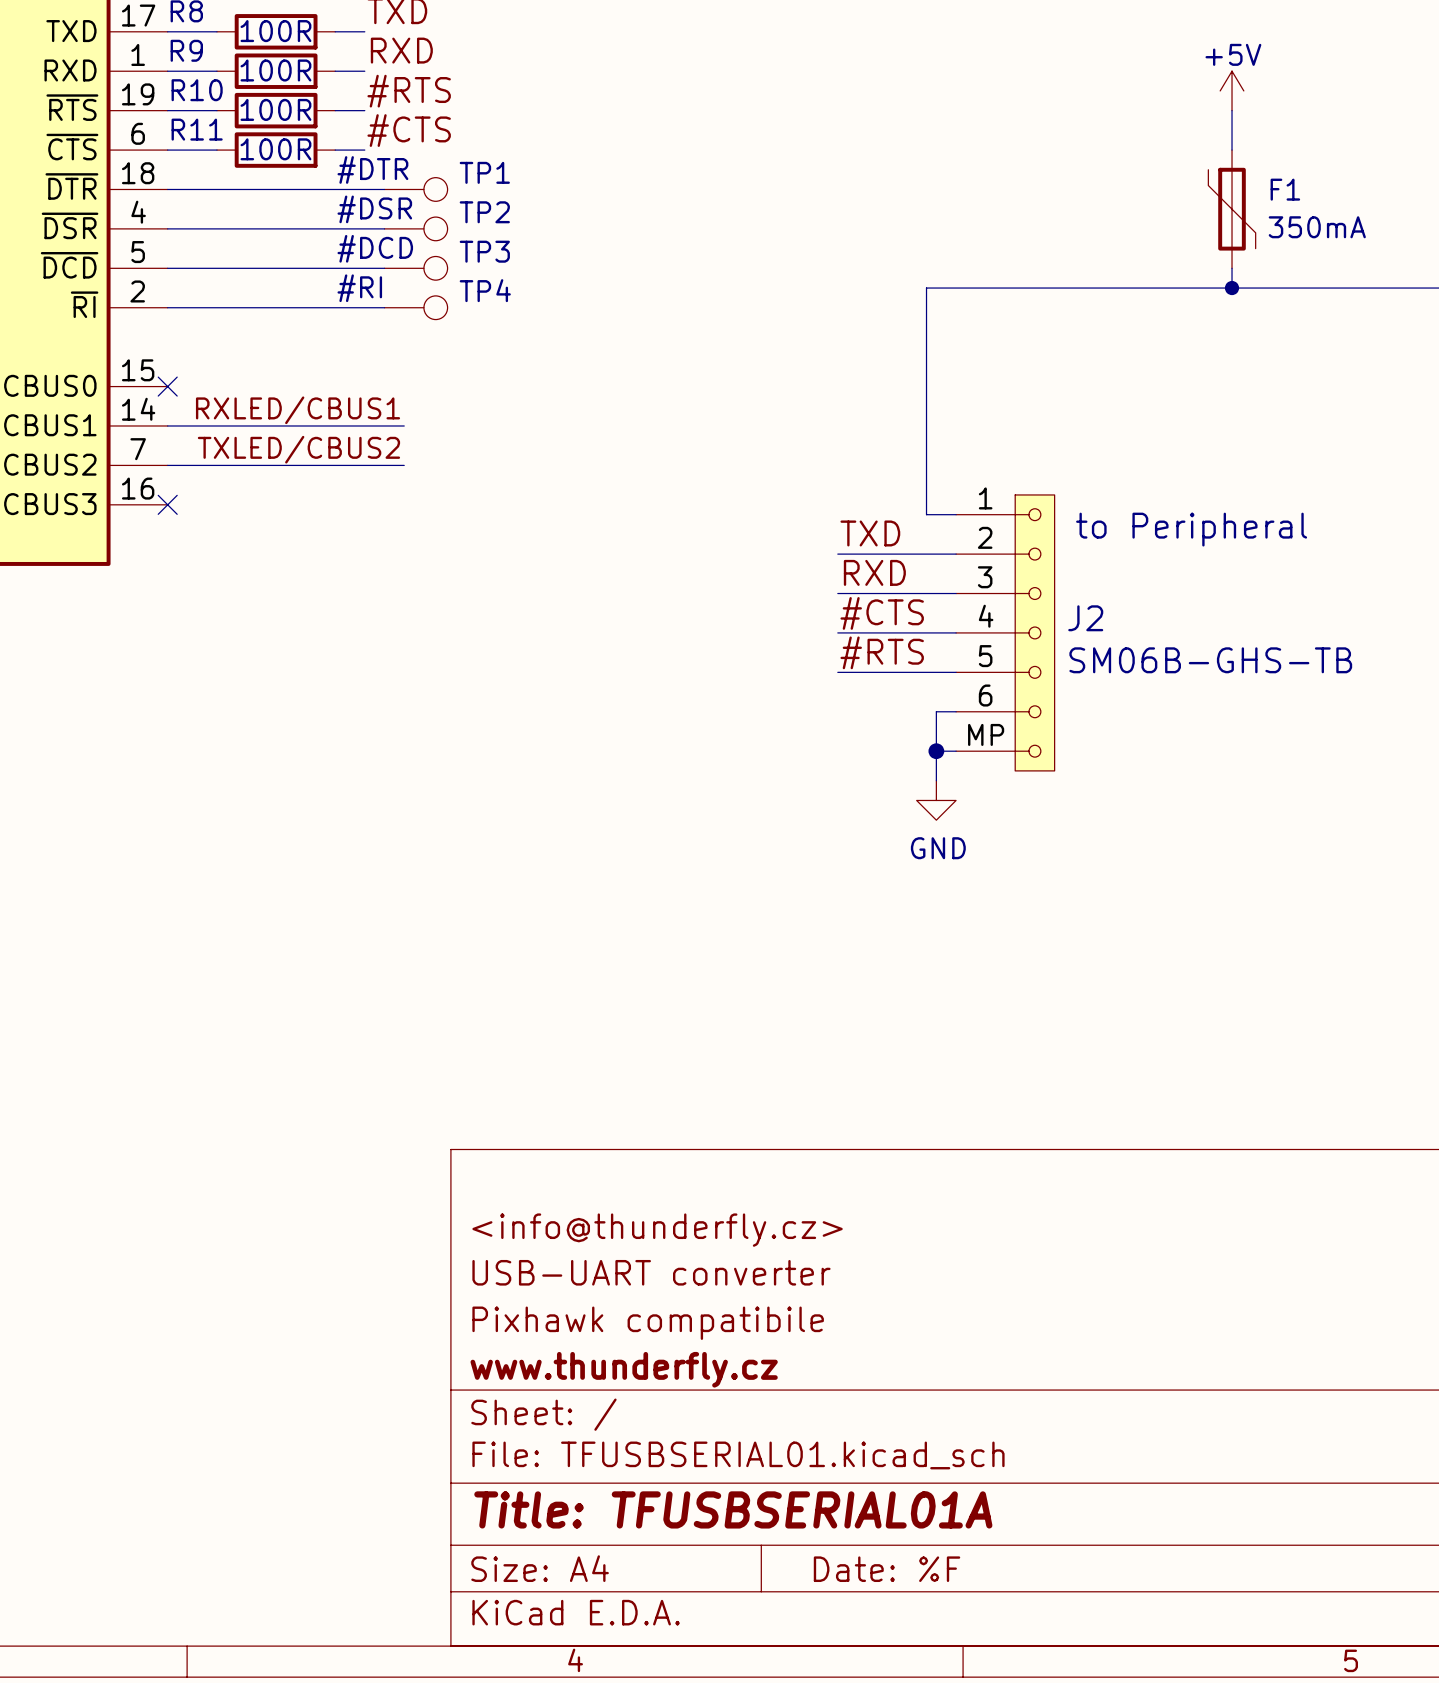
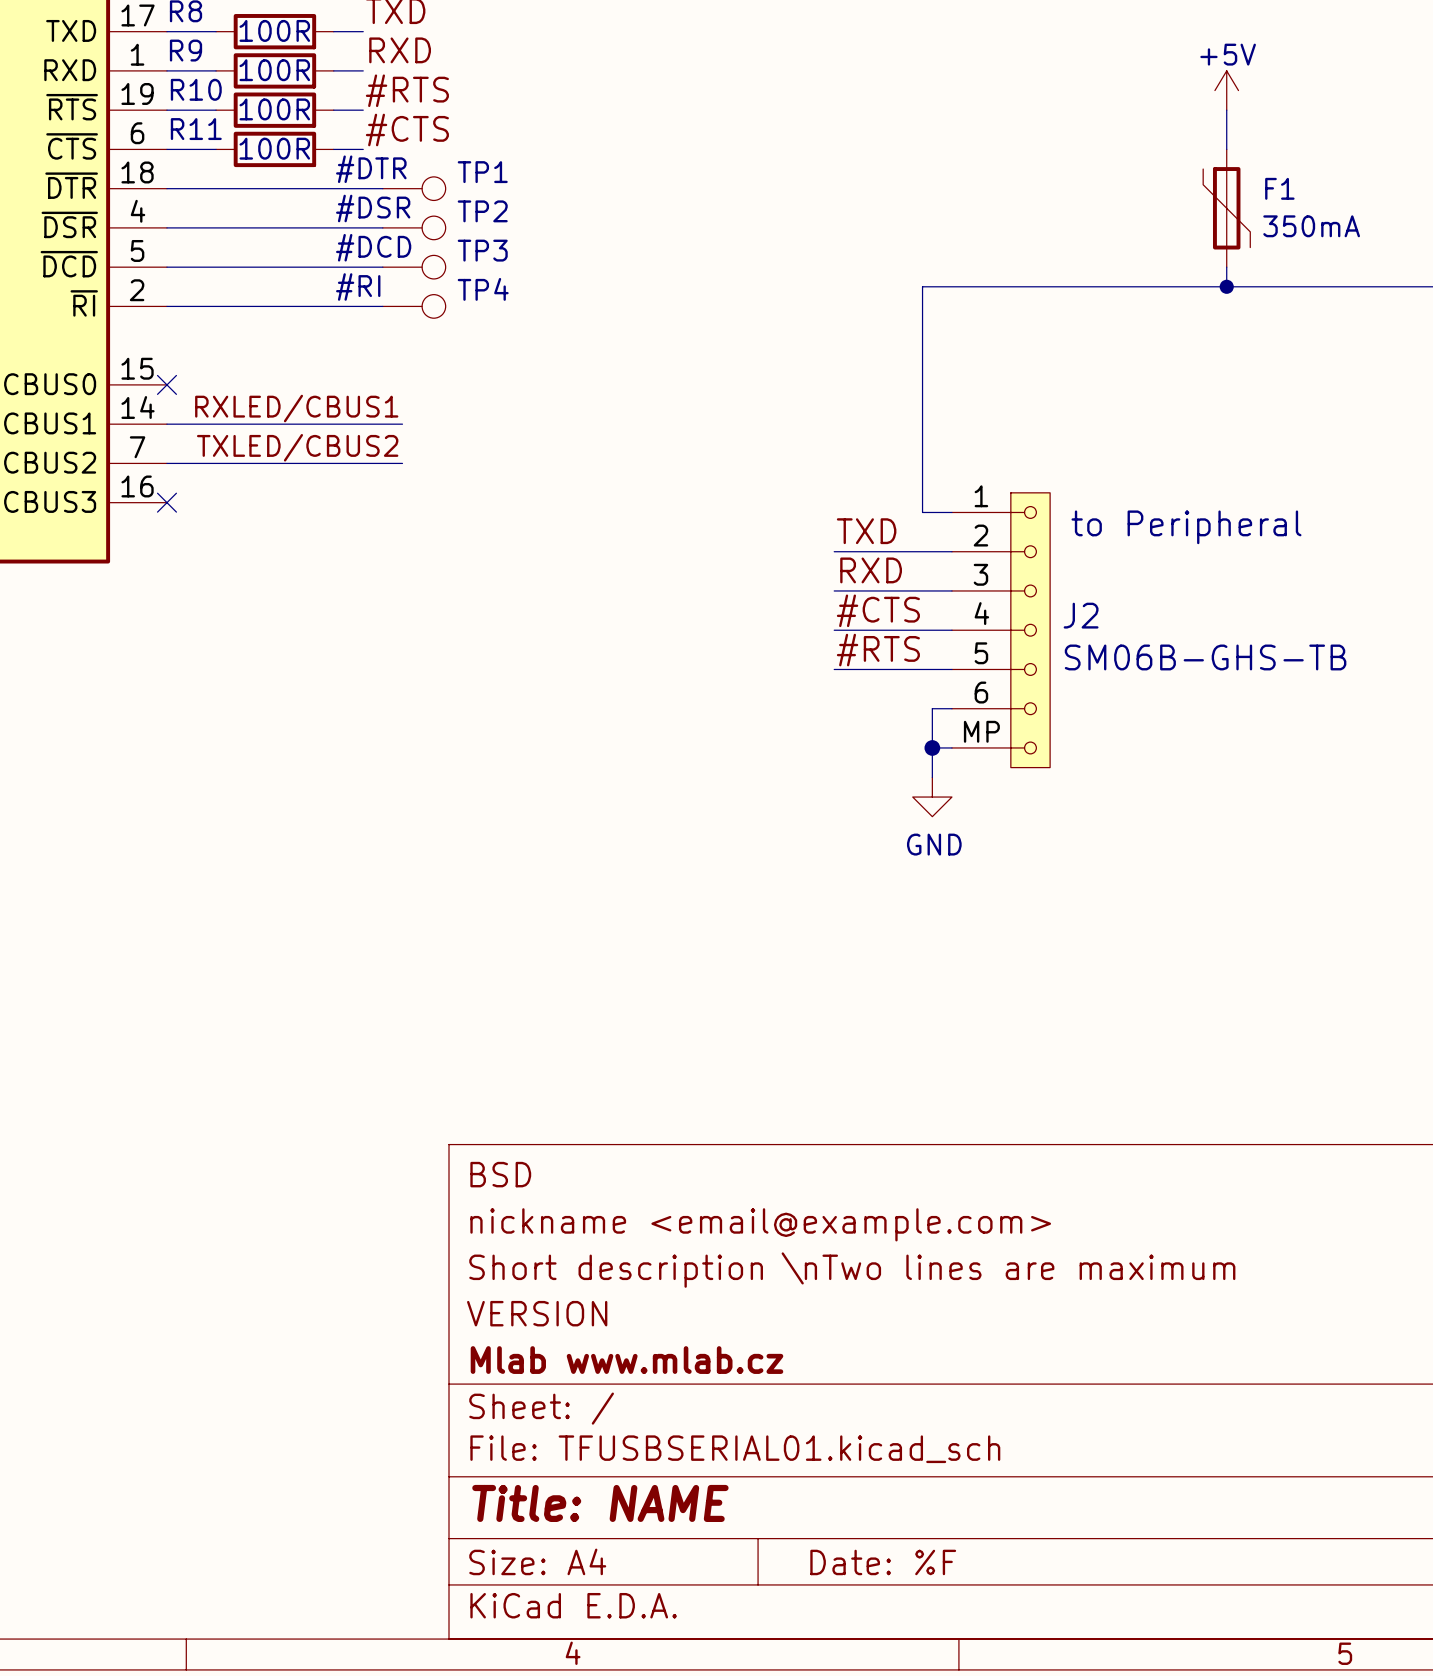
title block: none -> BSD (500, 1174)
title block: <info@thunderfly.cz> (657, 1230) -> nickname <email@example.com> (760, 1224)
title block: USB-UART converter (651, 1272) -> Short description \nTwo lines are maximum (852, 1270)
title block: Pixhawk compatibile (648, 1323) -> VERSION (537, 1313)
title block: www.thunderfly.cz (624, 1369) -> Mlab www.mlab.cz (626, 1360)
title block: Title: TFUSBSERIAL01A (733, 1509) -> Title: NAME (600, 1503)

